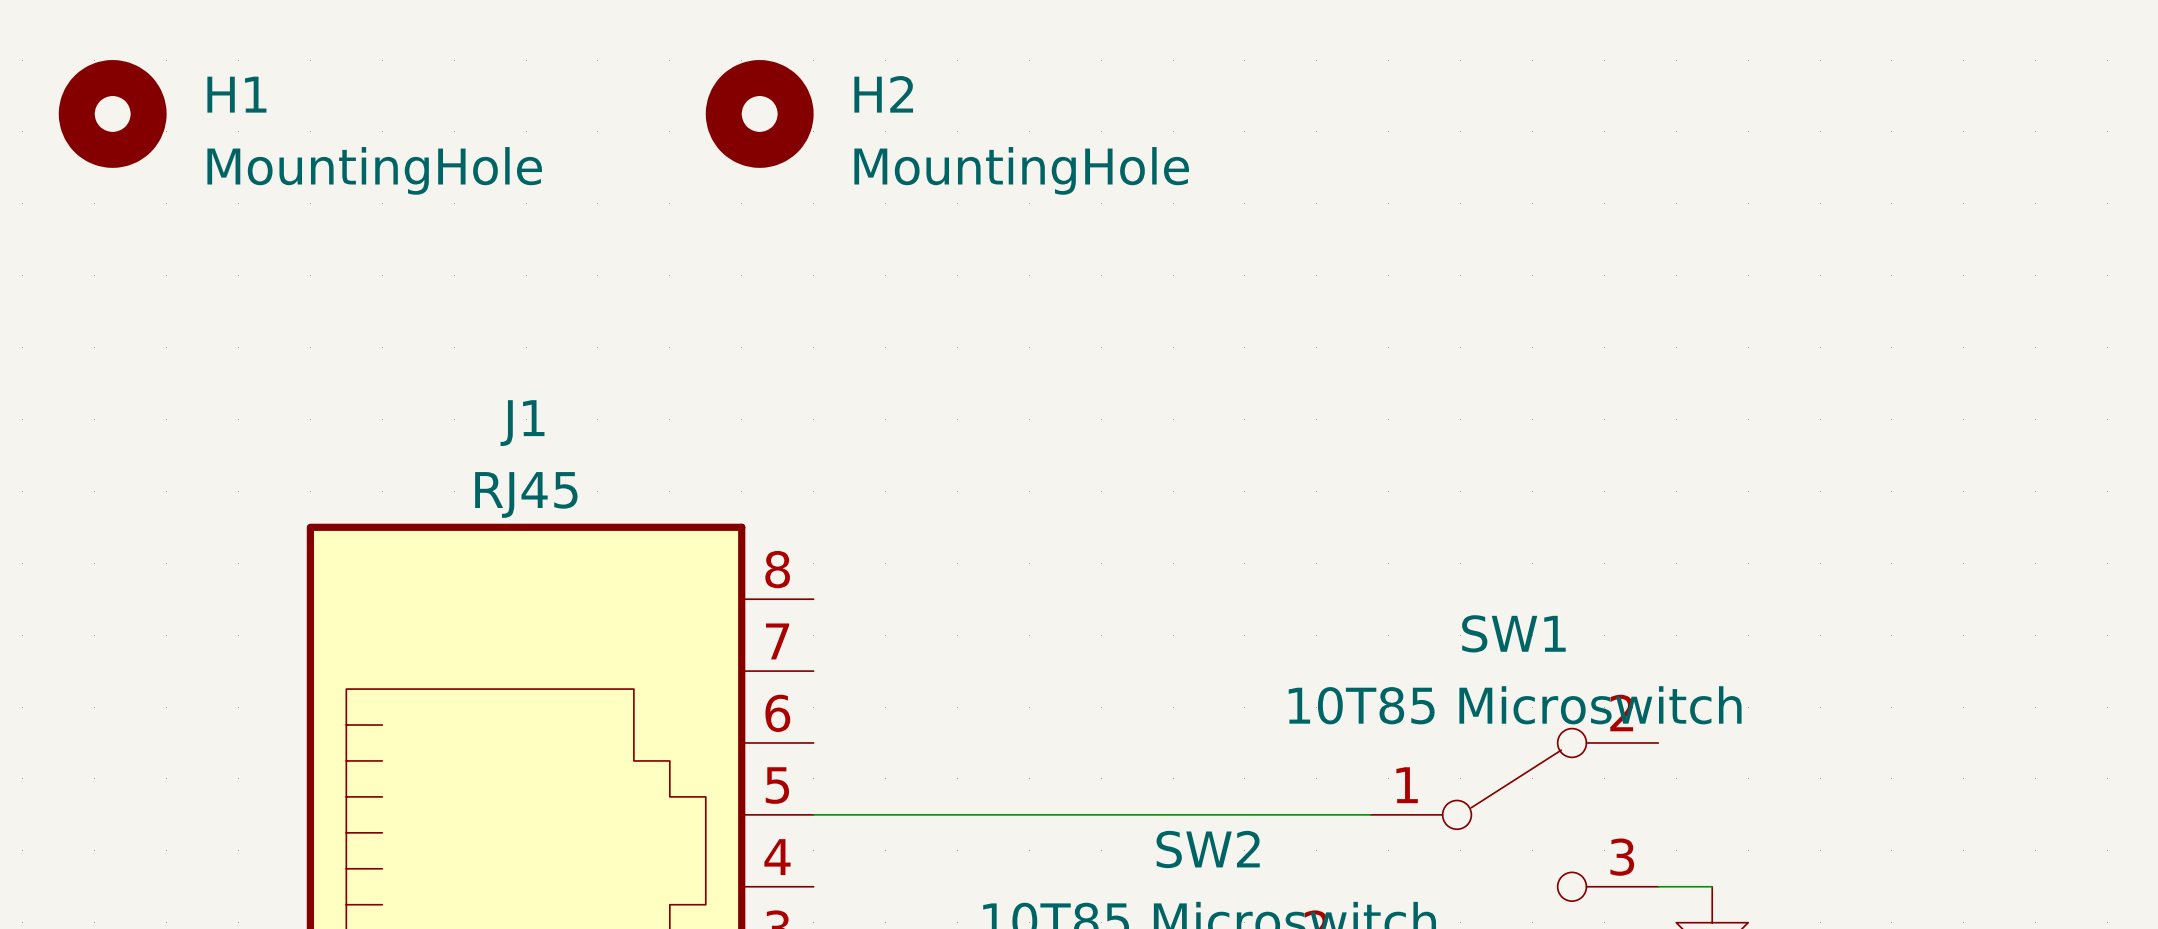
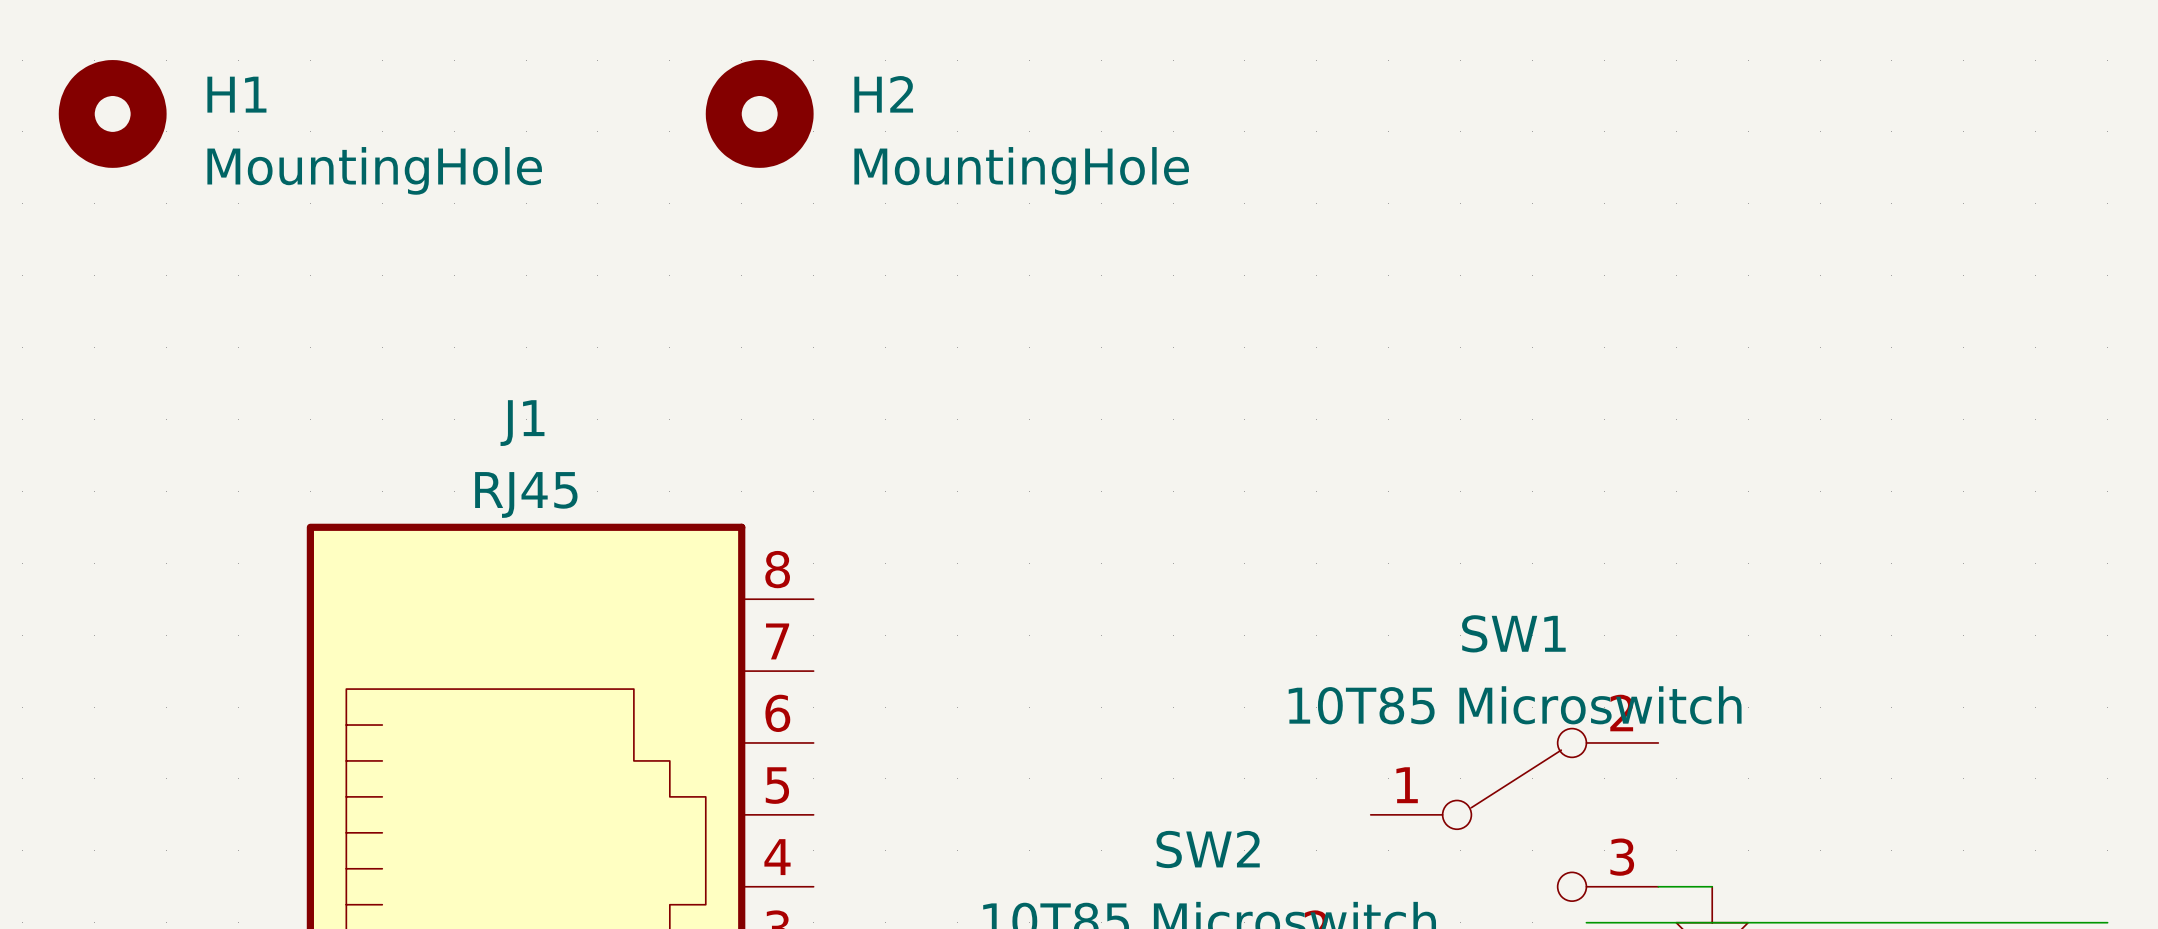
wire: (813, 814) (1370, 814) -> none
wire: none -> (1586, 922) (2107, 922)

